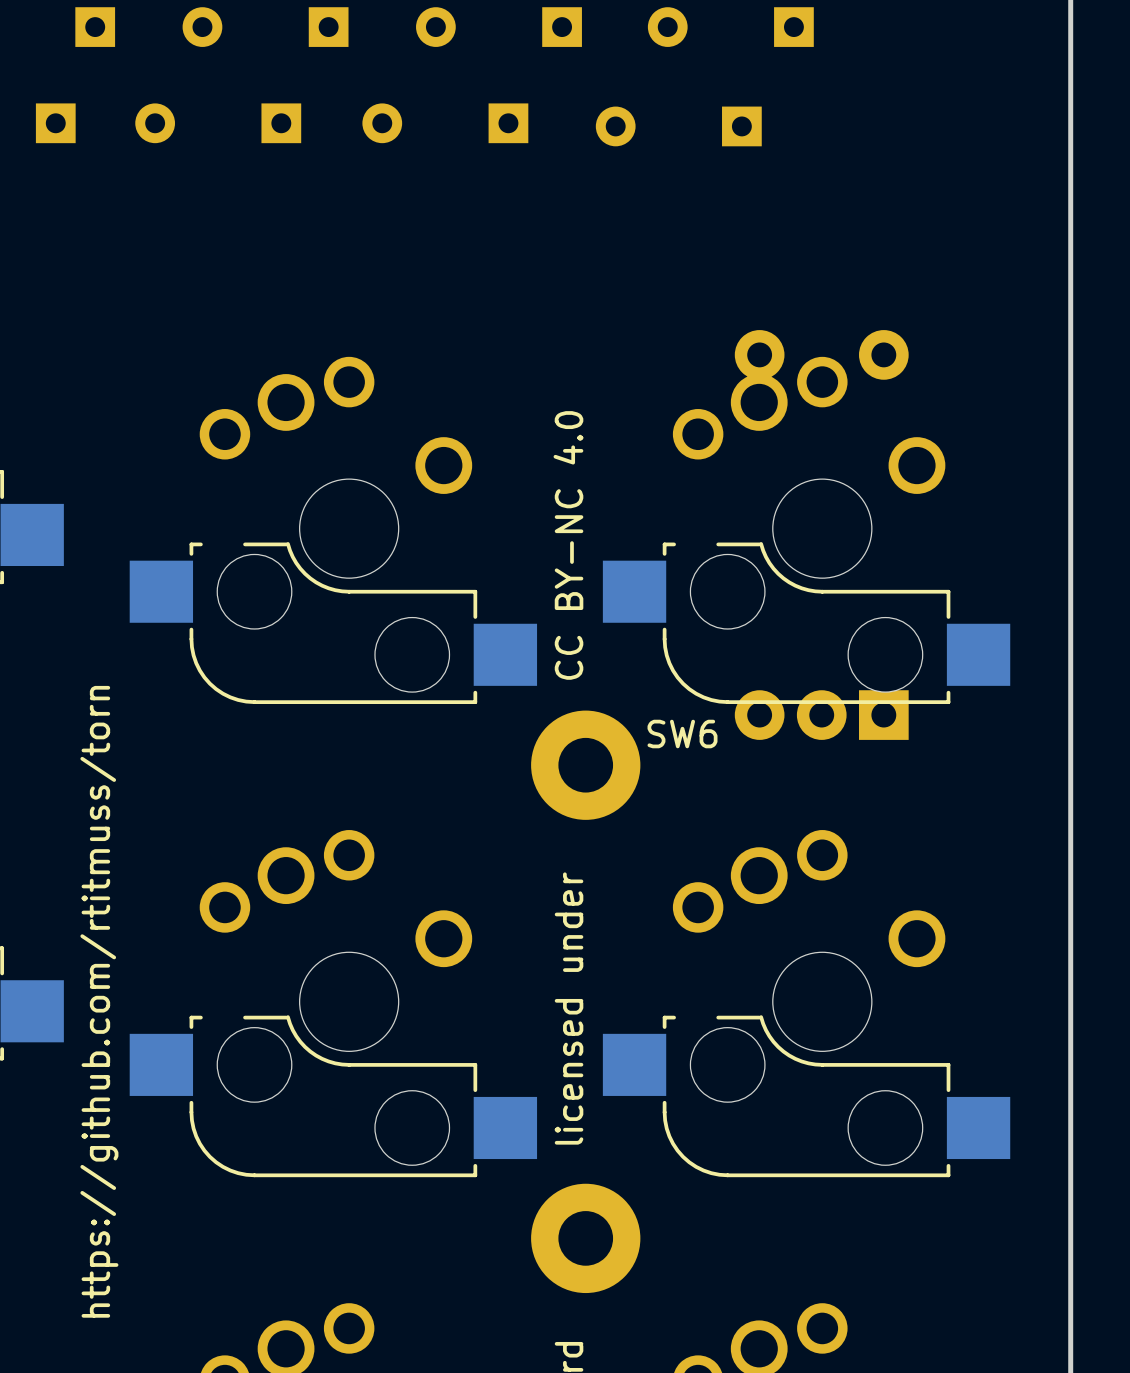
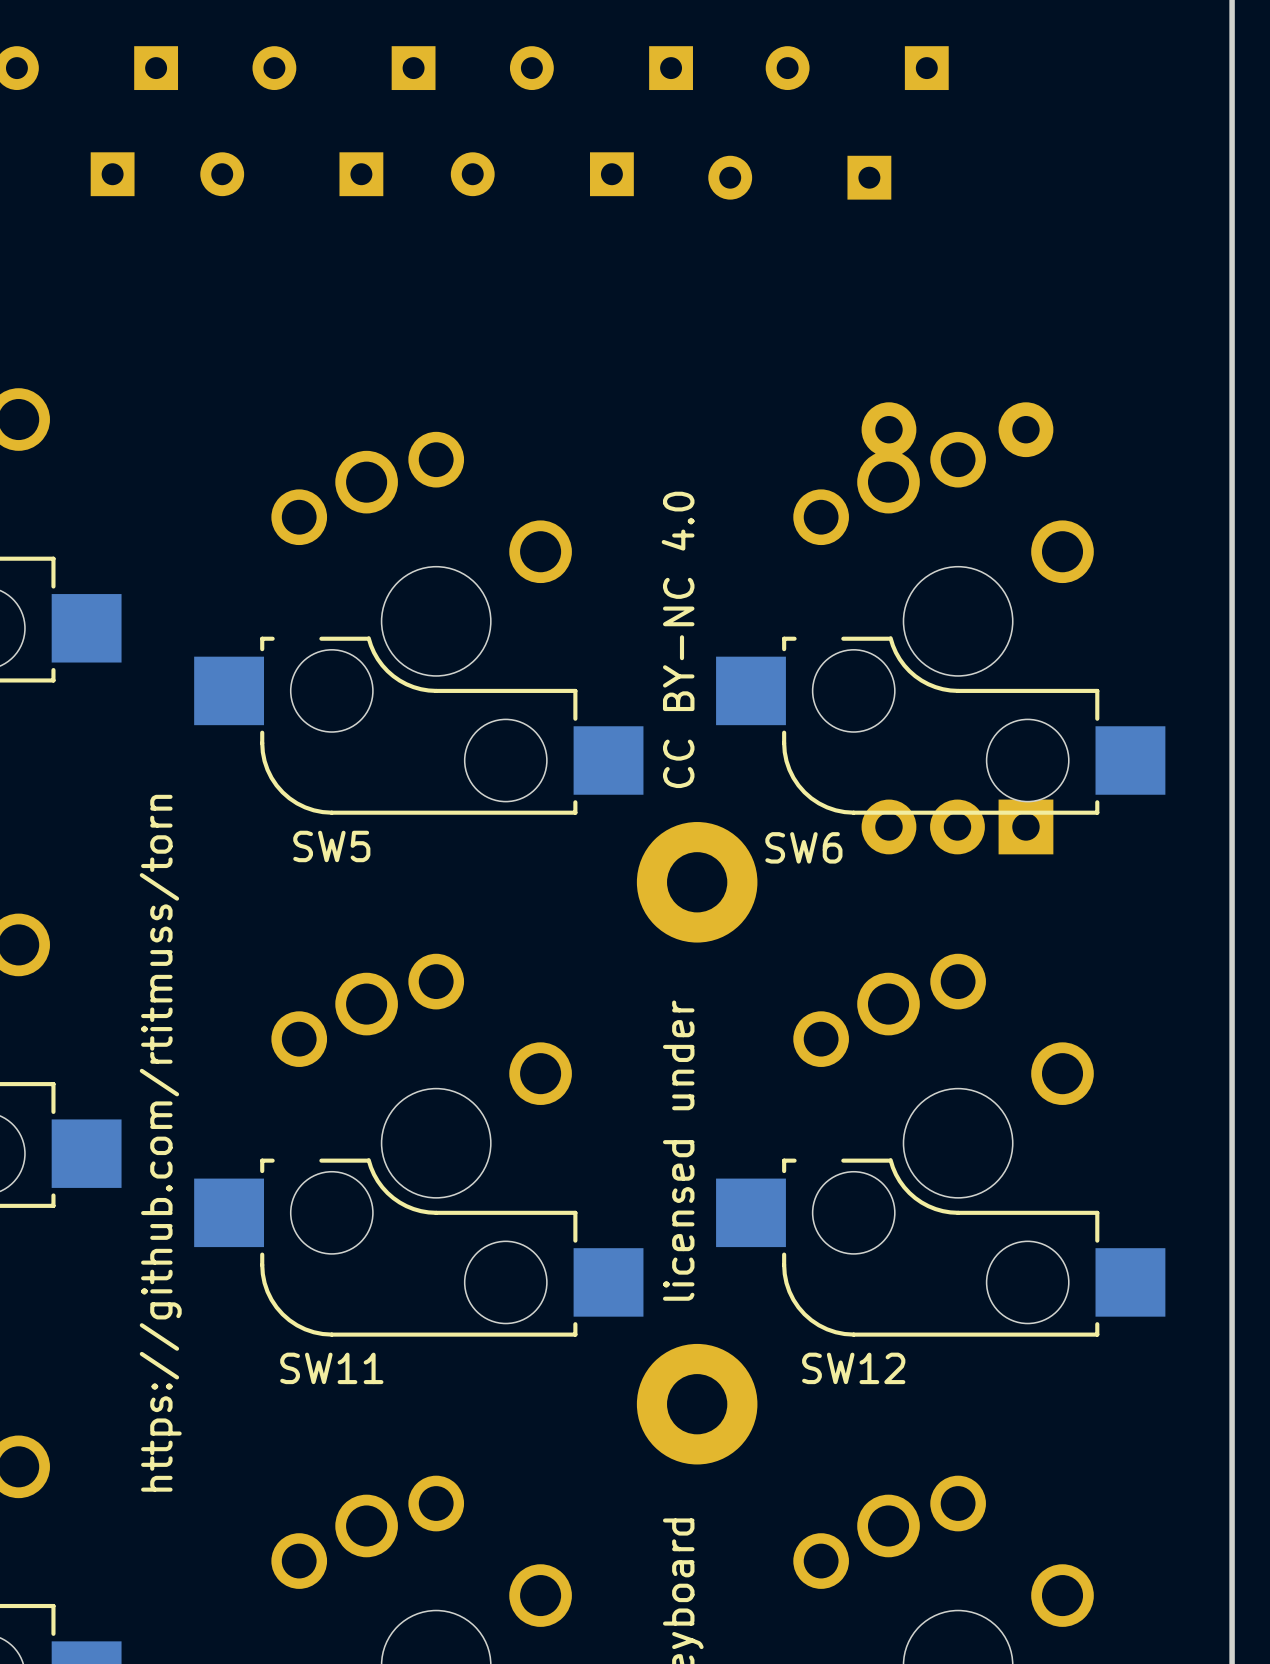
SW5 name: none -> SW5 (331, 846)
SW11 name: none -> SW11 (331, 1368)
SW12 name: none -> SW12 (853, 1368)

